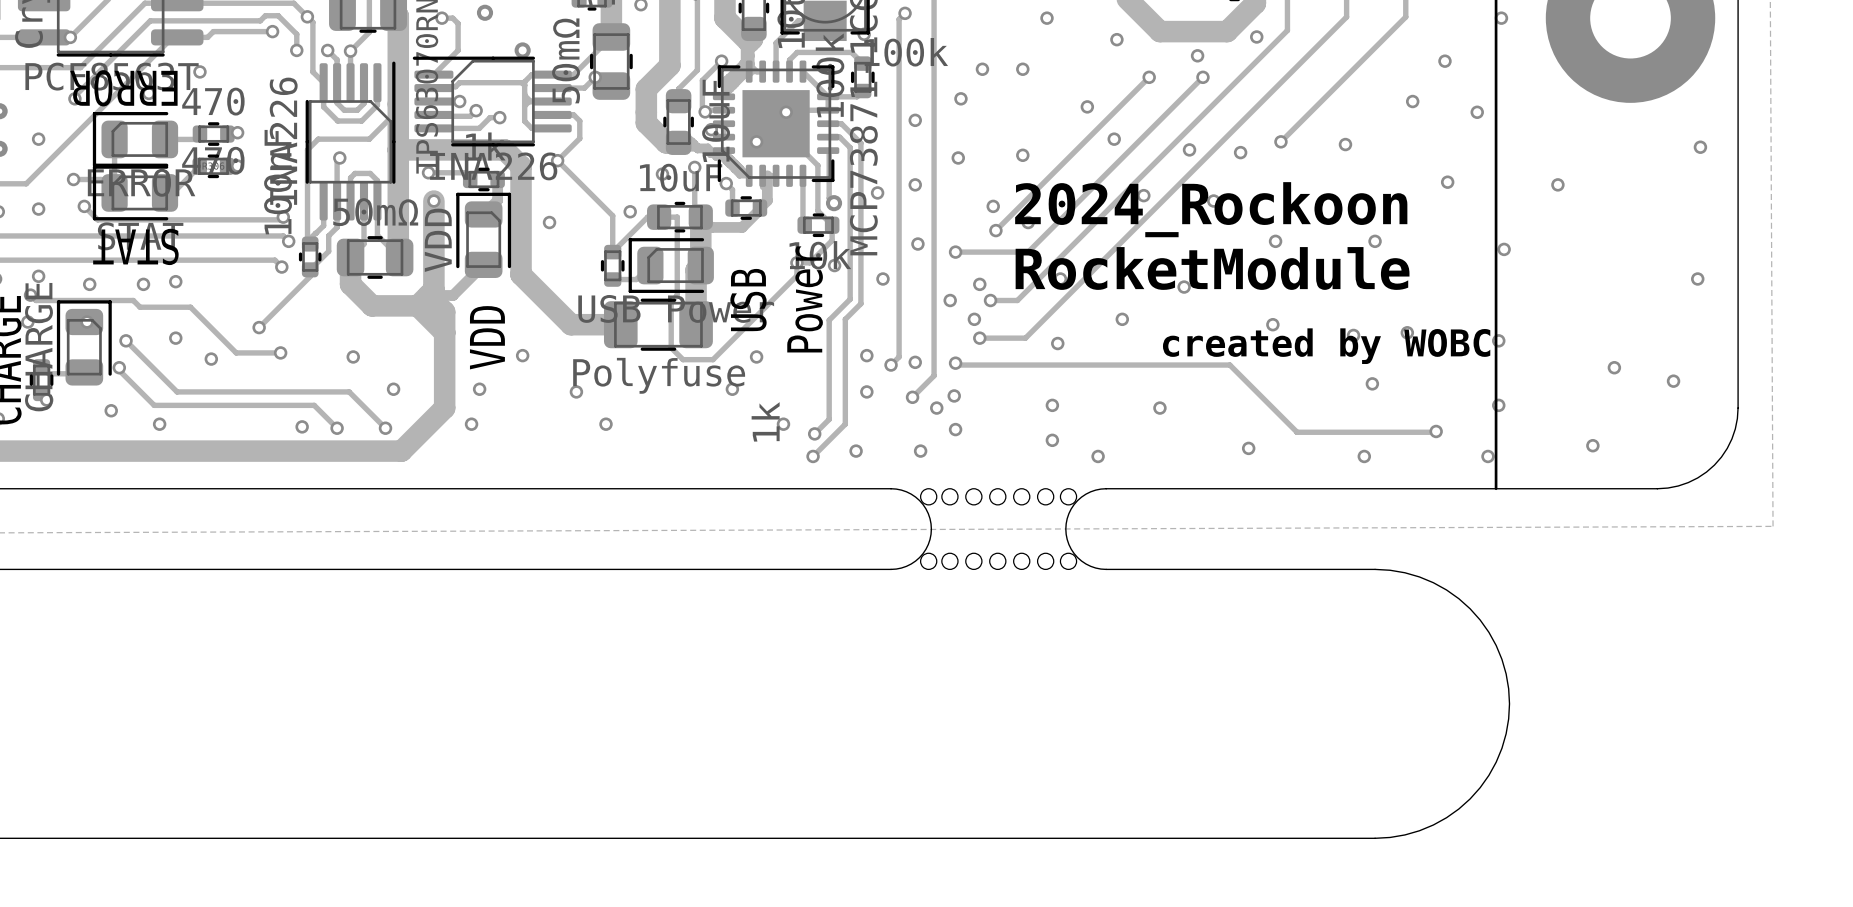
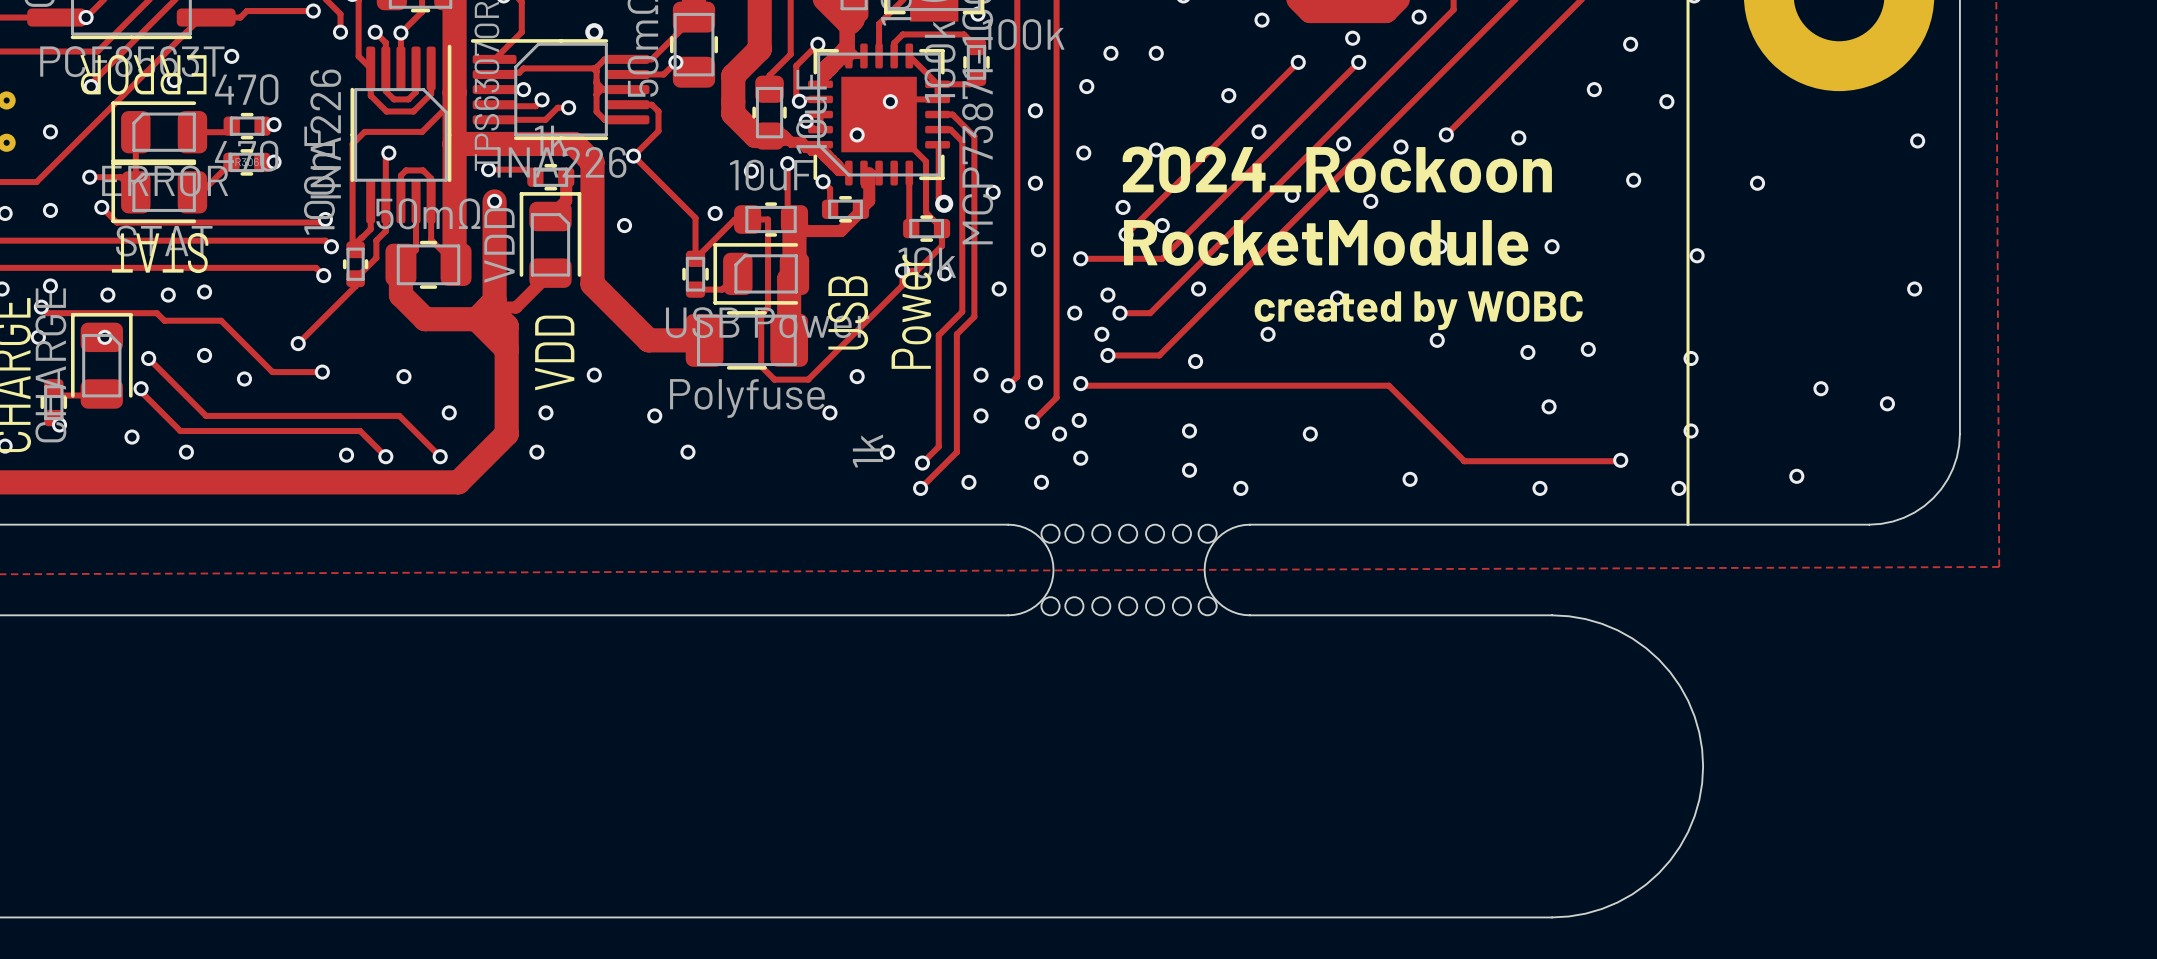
text position: 2024_Rockoon (1211, 209) -> 2024_Rockoon (1337, 169)
text position: RocketModule (1212, 268) -> RocketModule (1326, 242)
text position: created by WOBC (1326, 346) -> created by WOBC (1418, 310)

